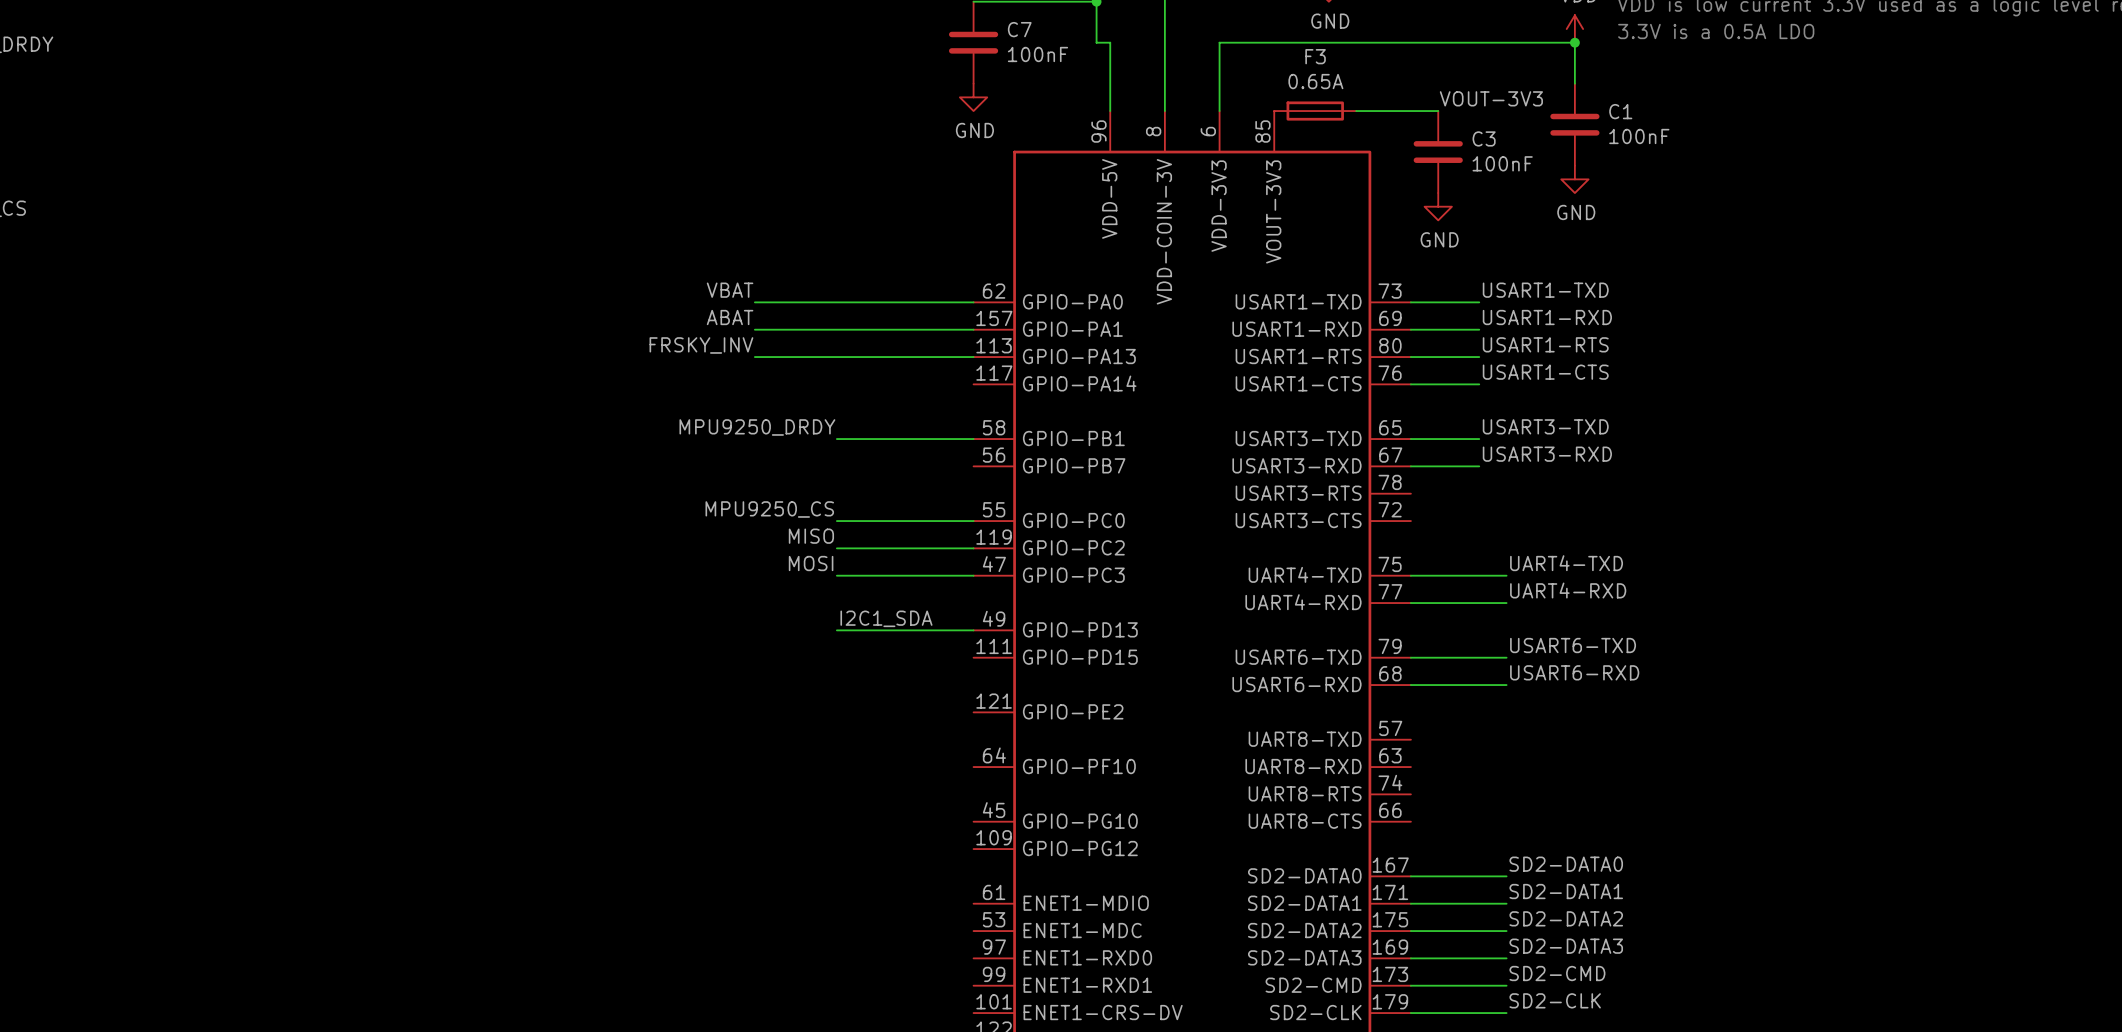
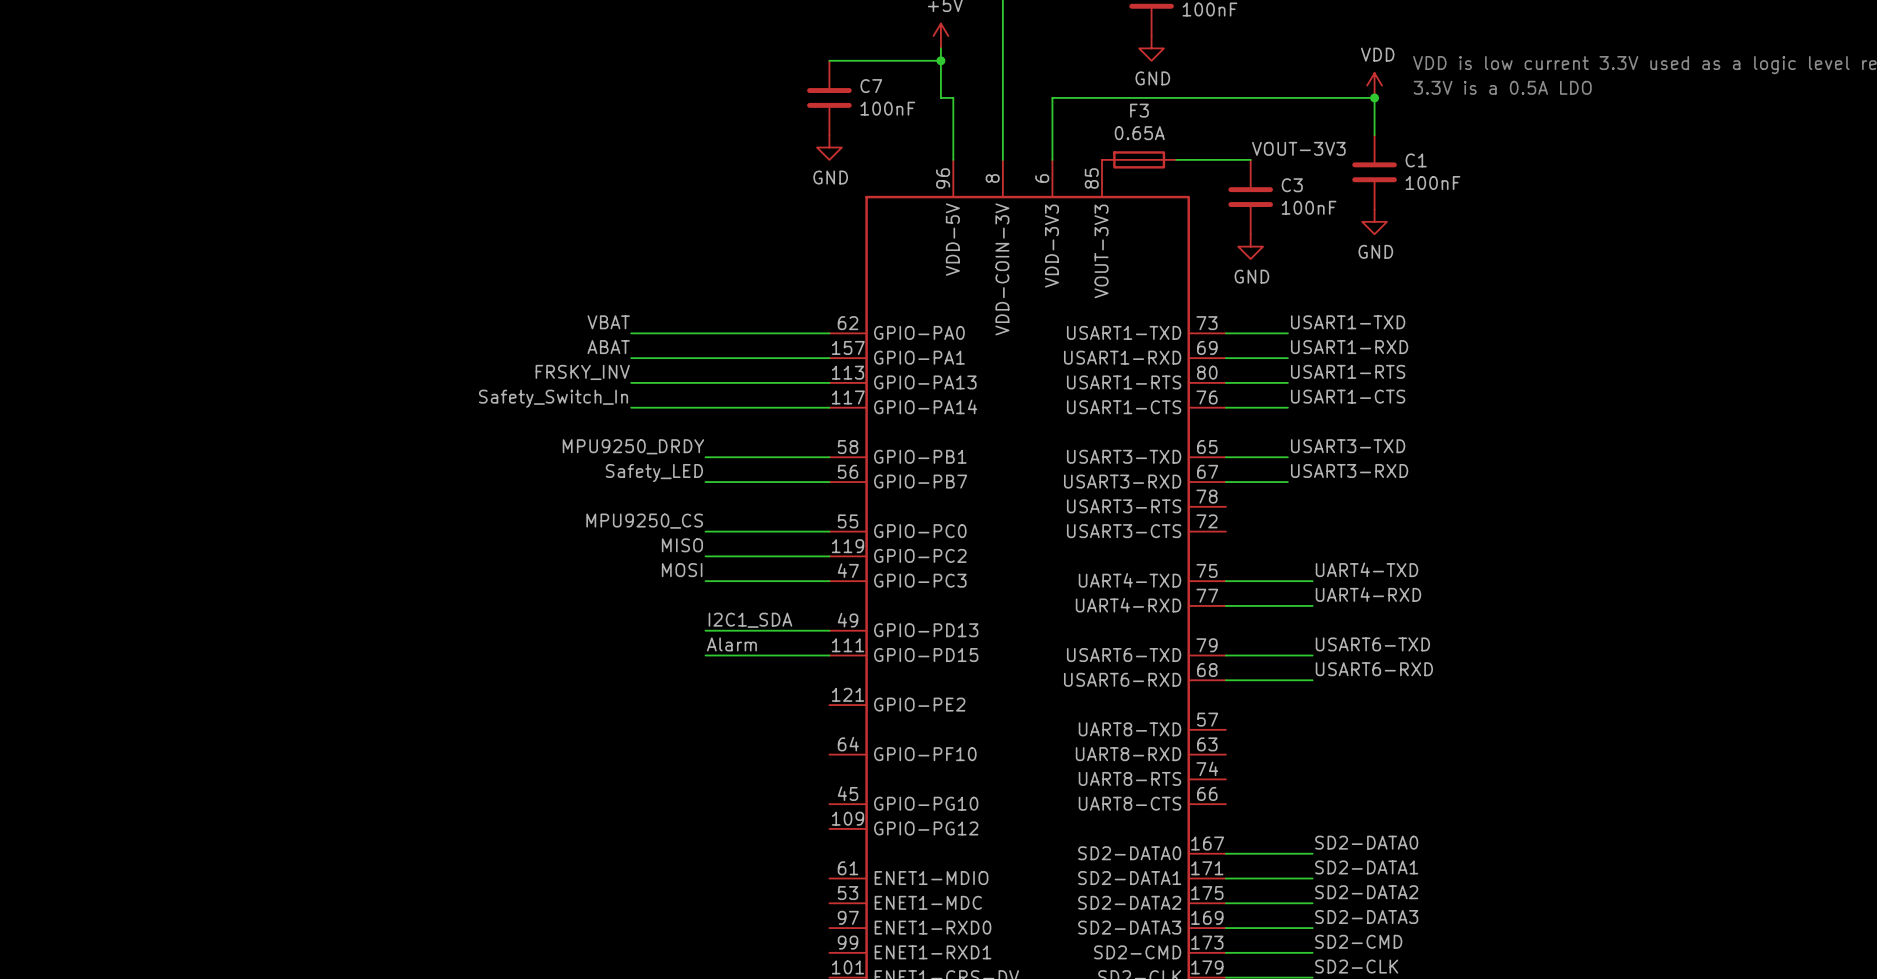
label: none -> Safety_Switch_In (553, 398)
wire: none -> (631, 407) (829, 407)
label: none -> Safety_LED (654, 473)
wire: none -> (705, 482) (829, 482)
label: none -> Alarm (731, 644)
wire: none -> (705, 655) (829, 655)

